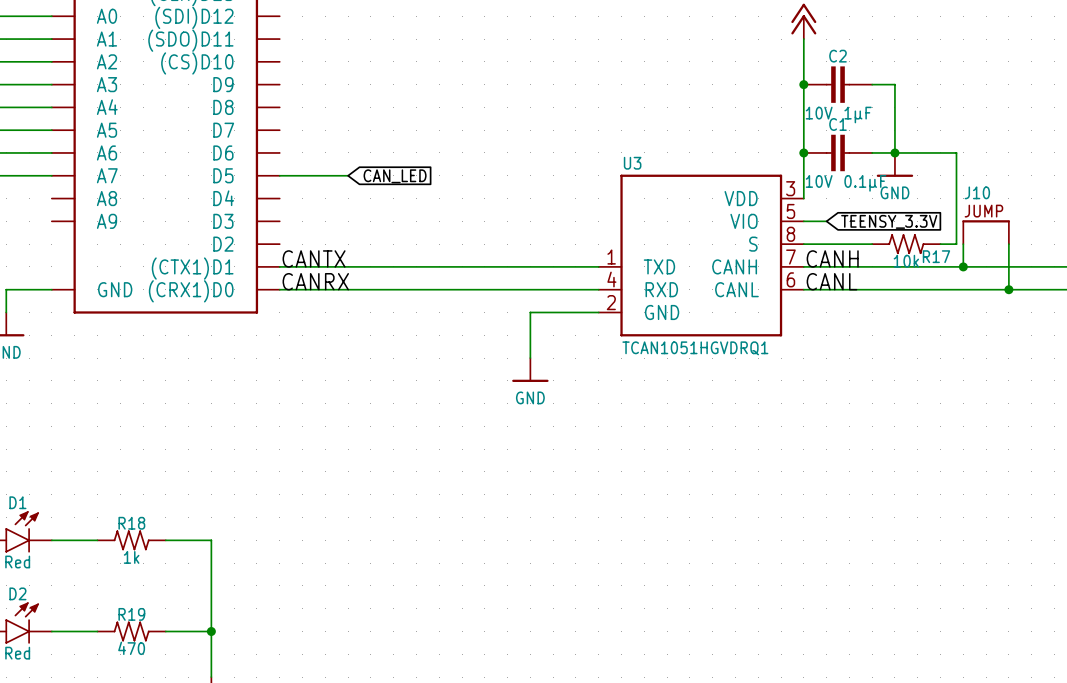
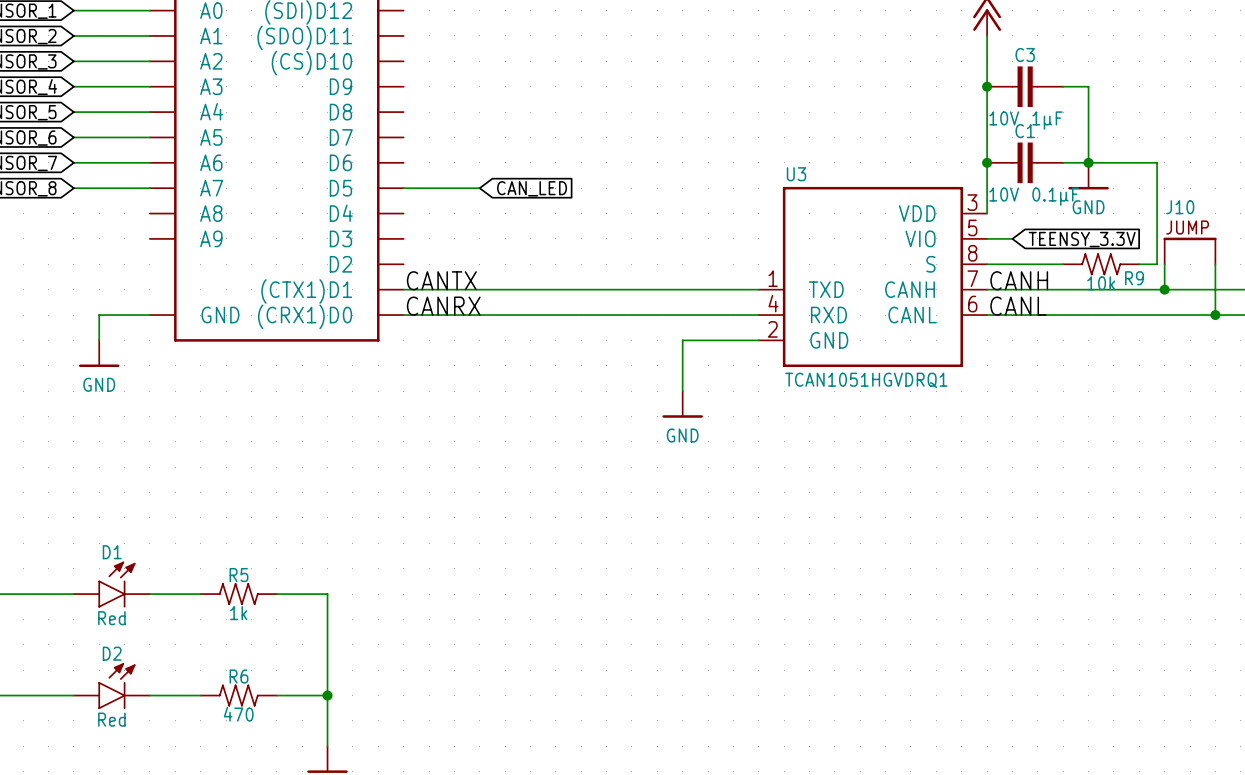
C2 name: C2 (838, 56) -> C3 (1025, 55)
R17 name: R17 (936, 256) -> R9 (1134, 278)
R18 name: R18 (131, 523) -> R5 (239, 575)
R19 name: R19 (131, 614) -> R6 (239, 676)

